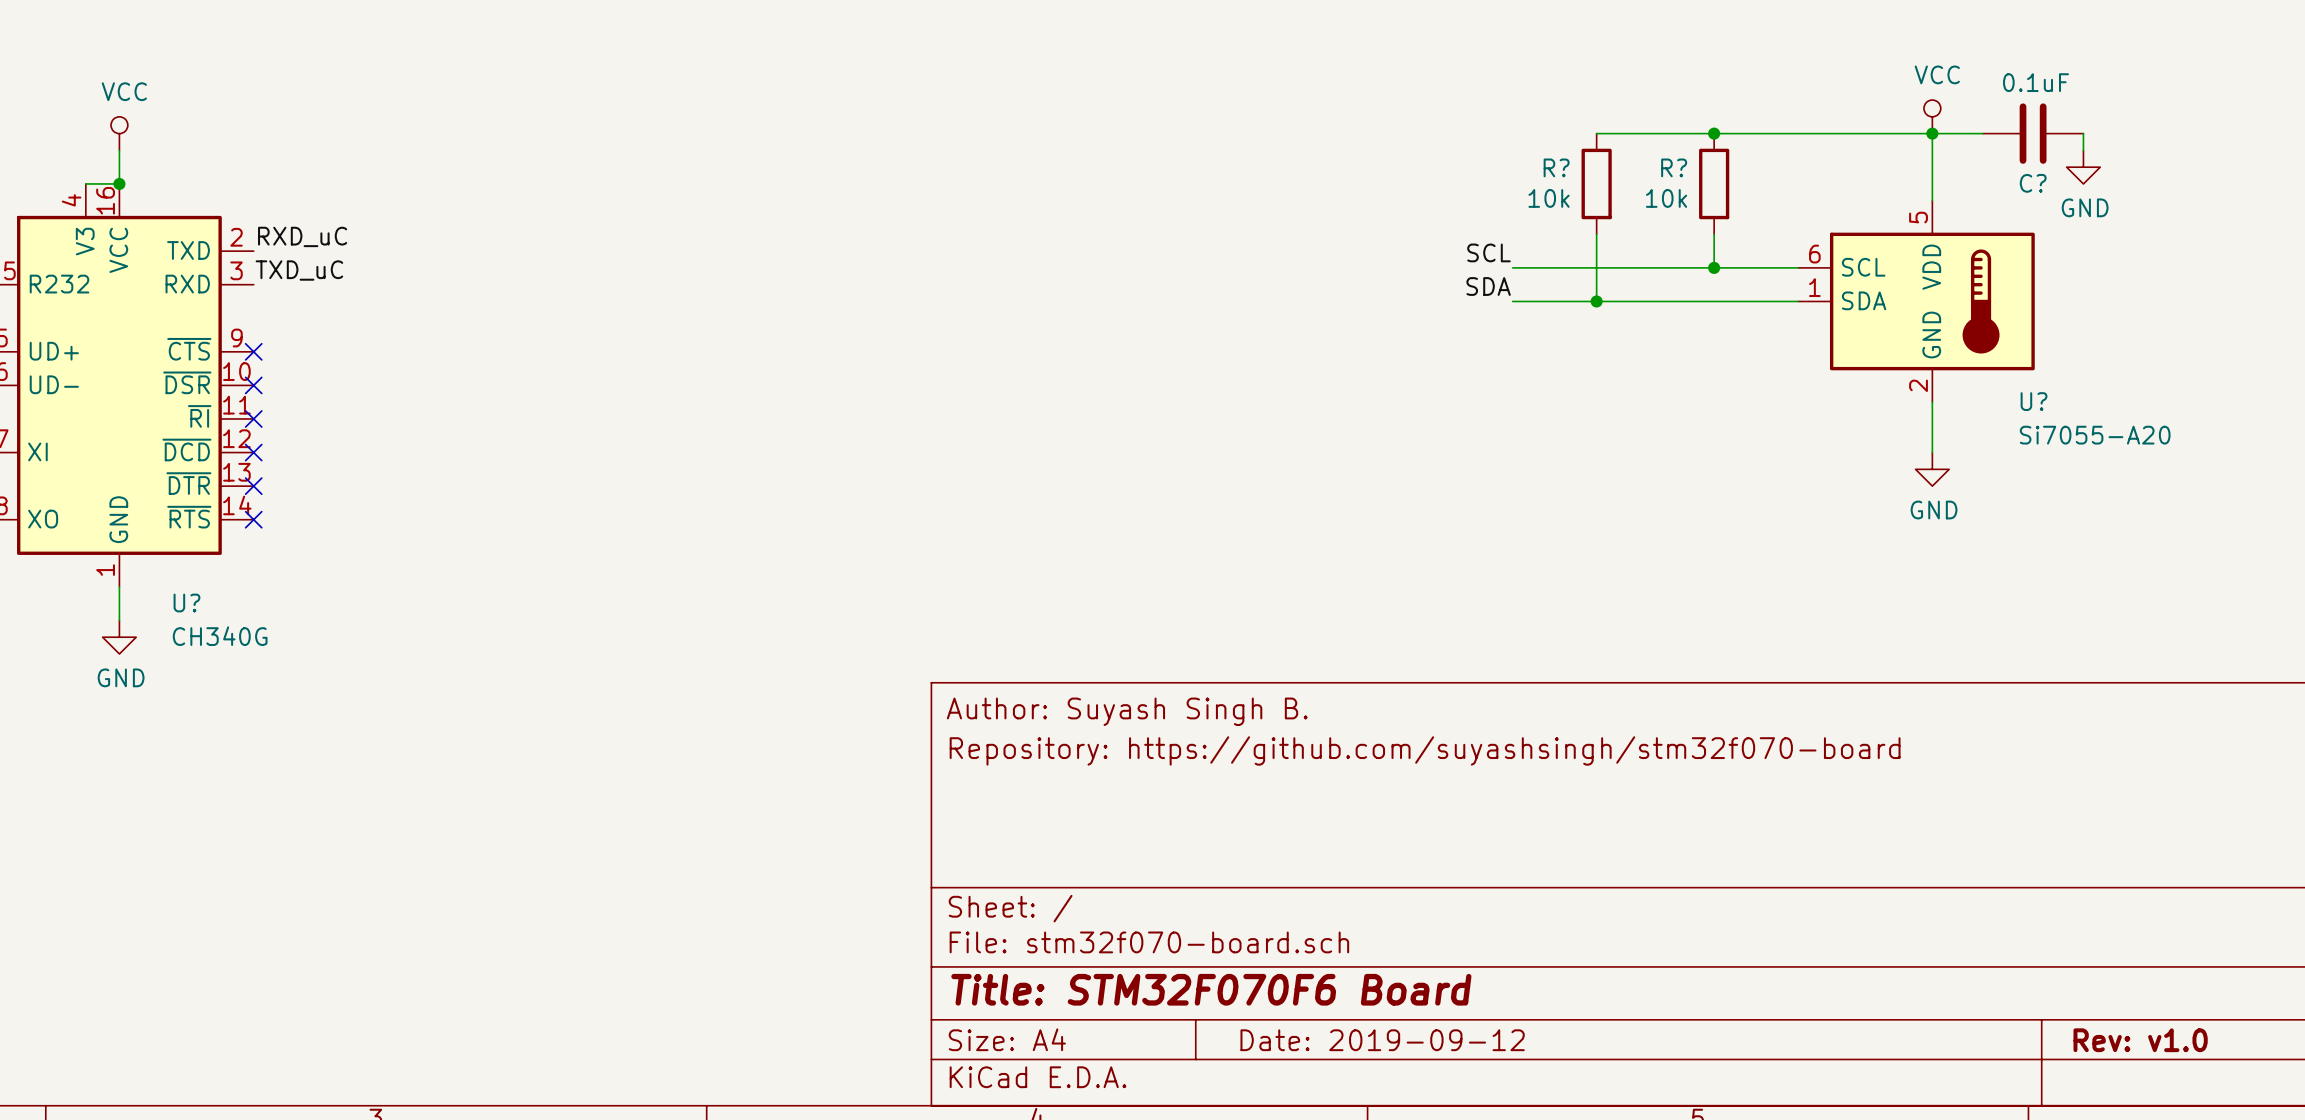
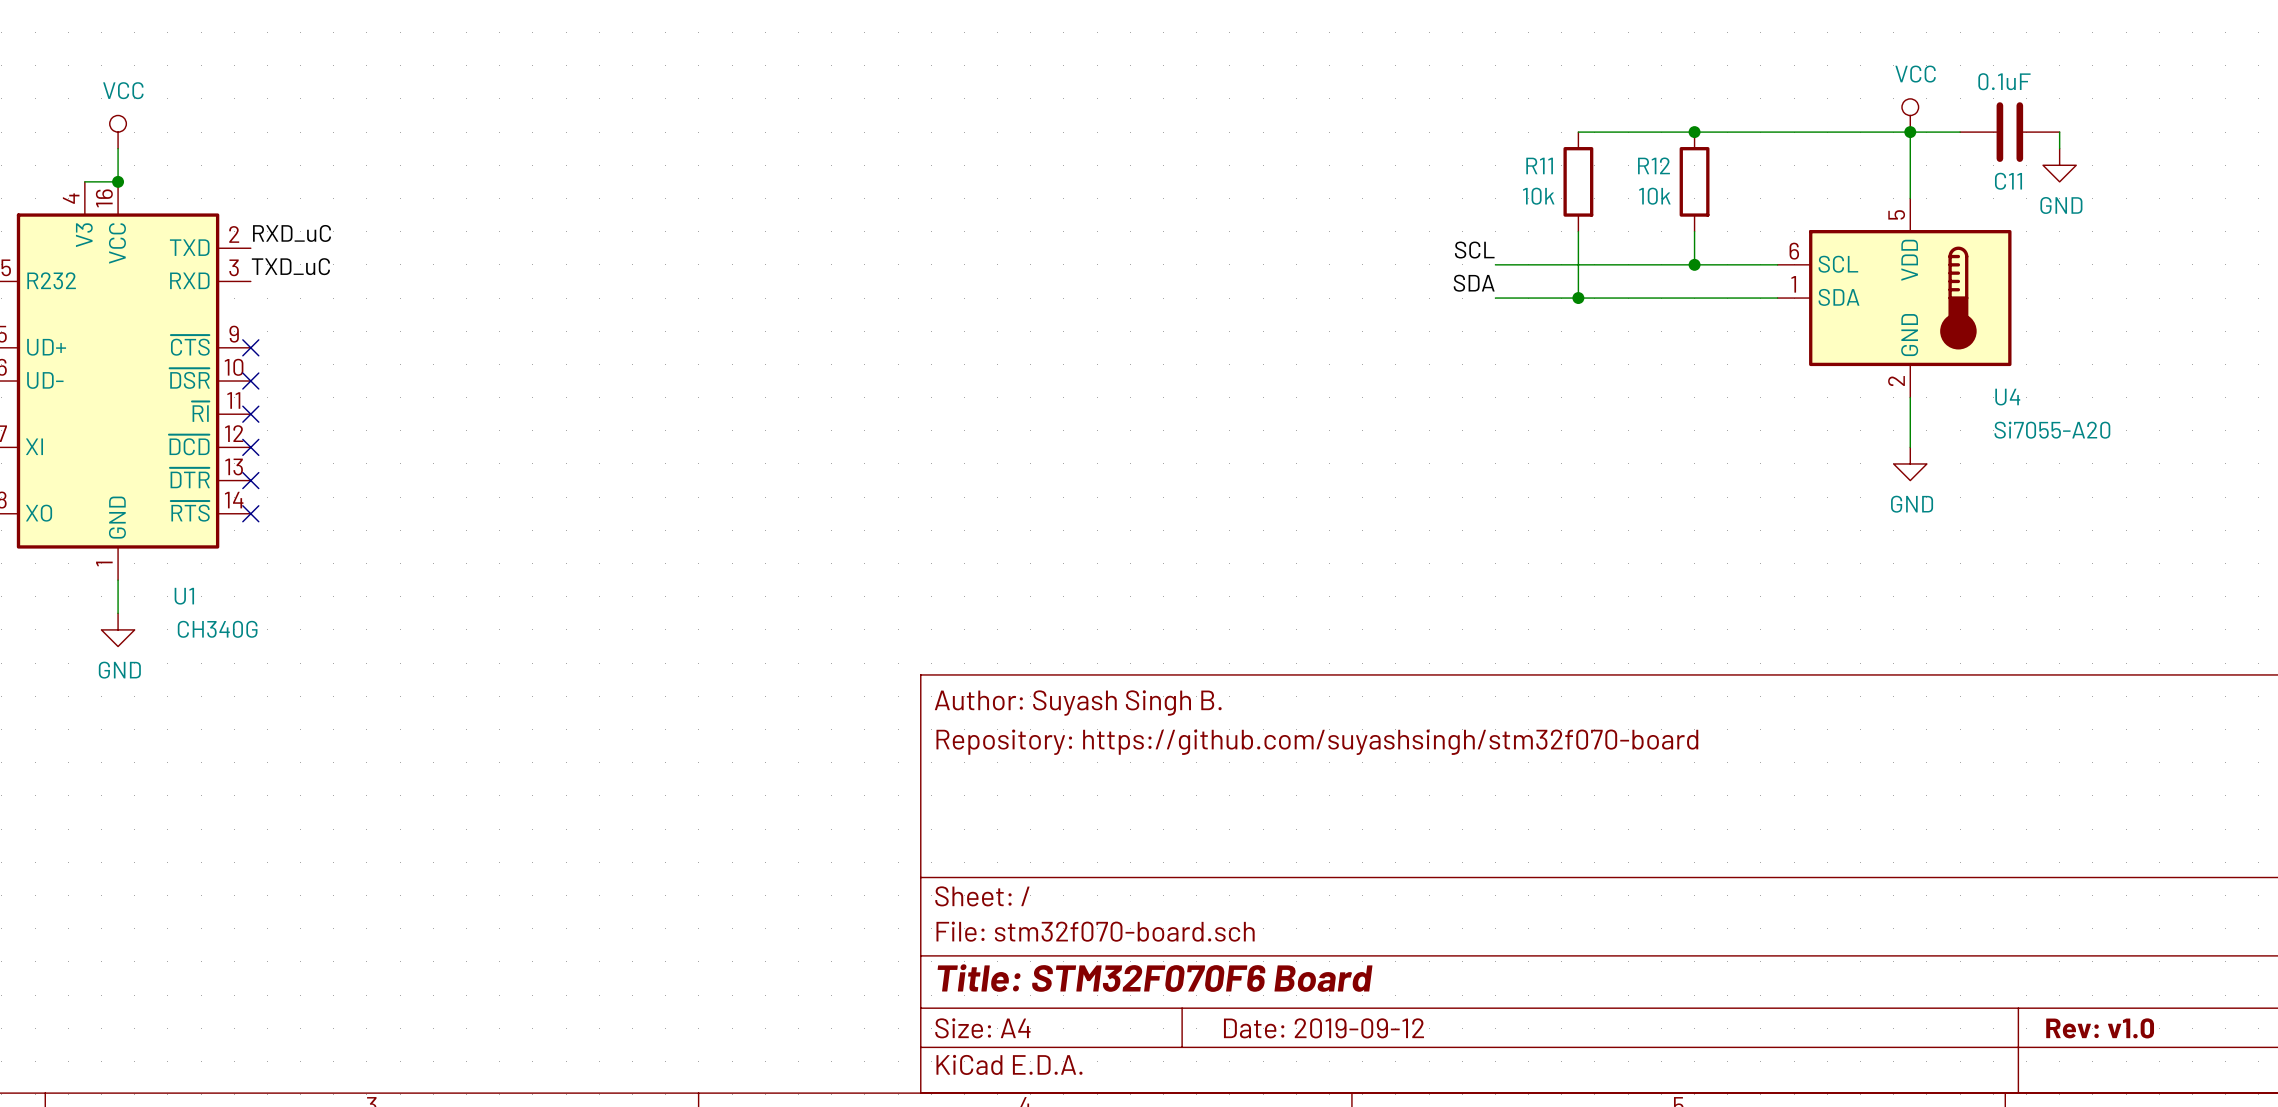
R? name: R? (1556, 167) -> R11 (1539, 165)
R? name: R? (1674, 167) -> R12 (1653, 165)
C? name: C? (2033, 183) -> C11 (2008, 181)
U? name: U? (2034, 401) -> U4 (2007, 397)
U? name: U? (186, 603) -> U1 (184, 596)

